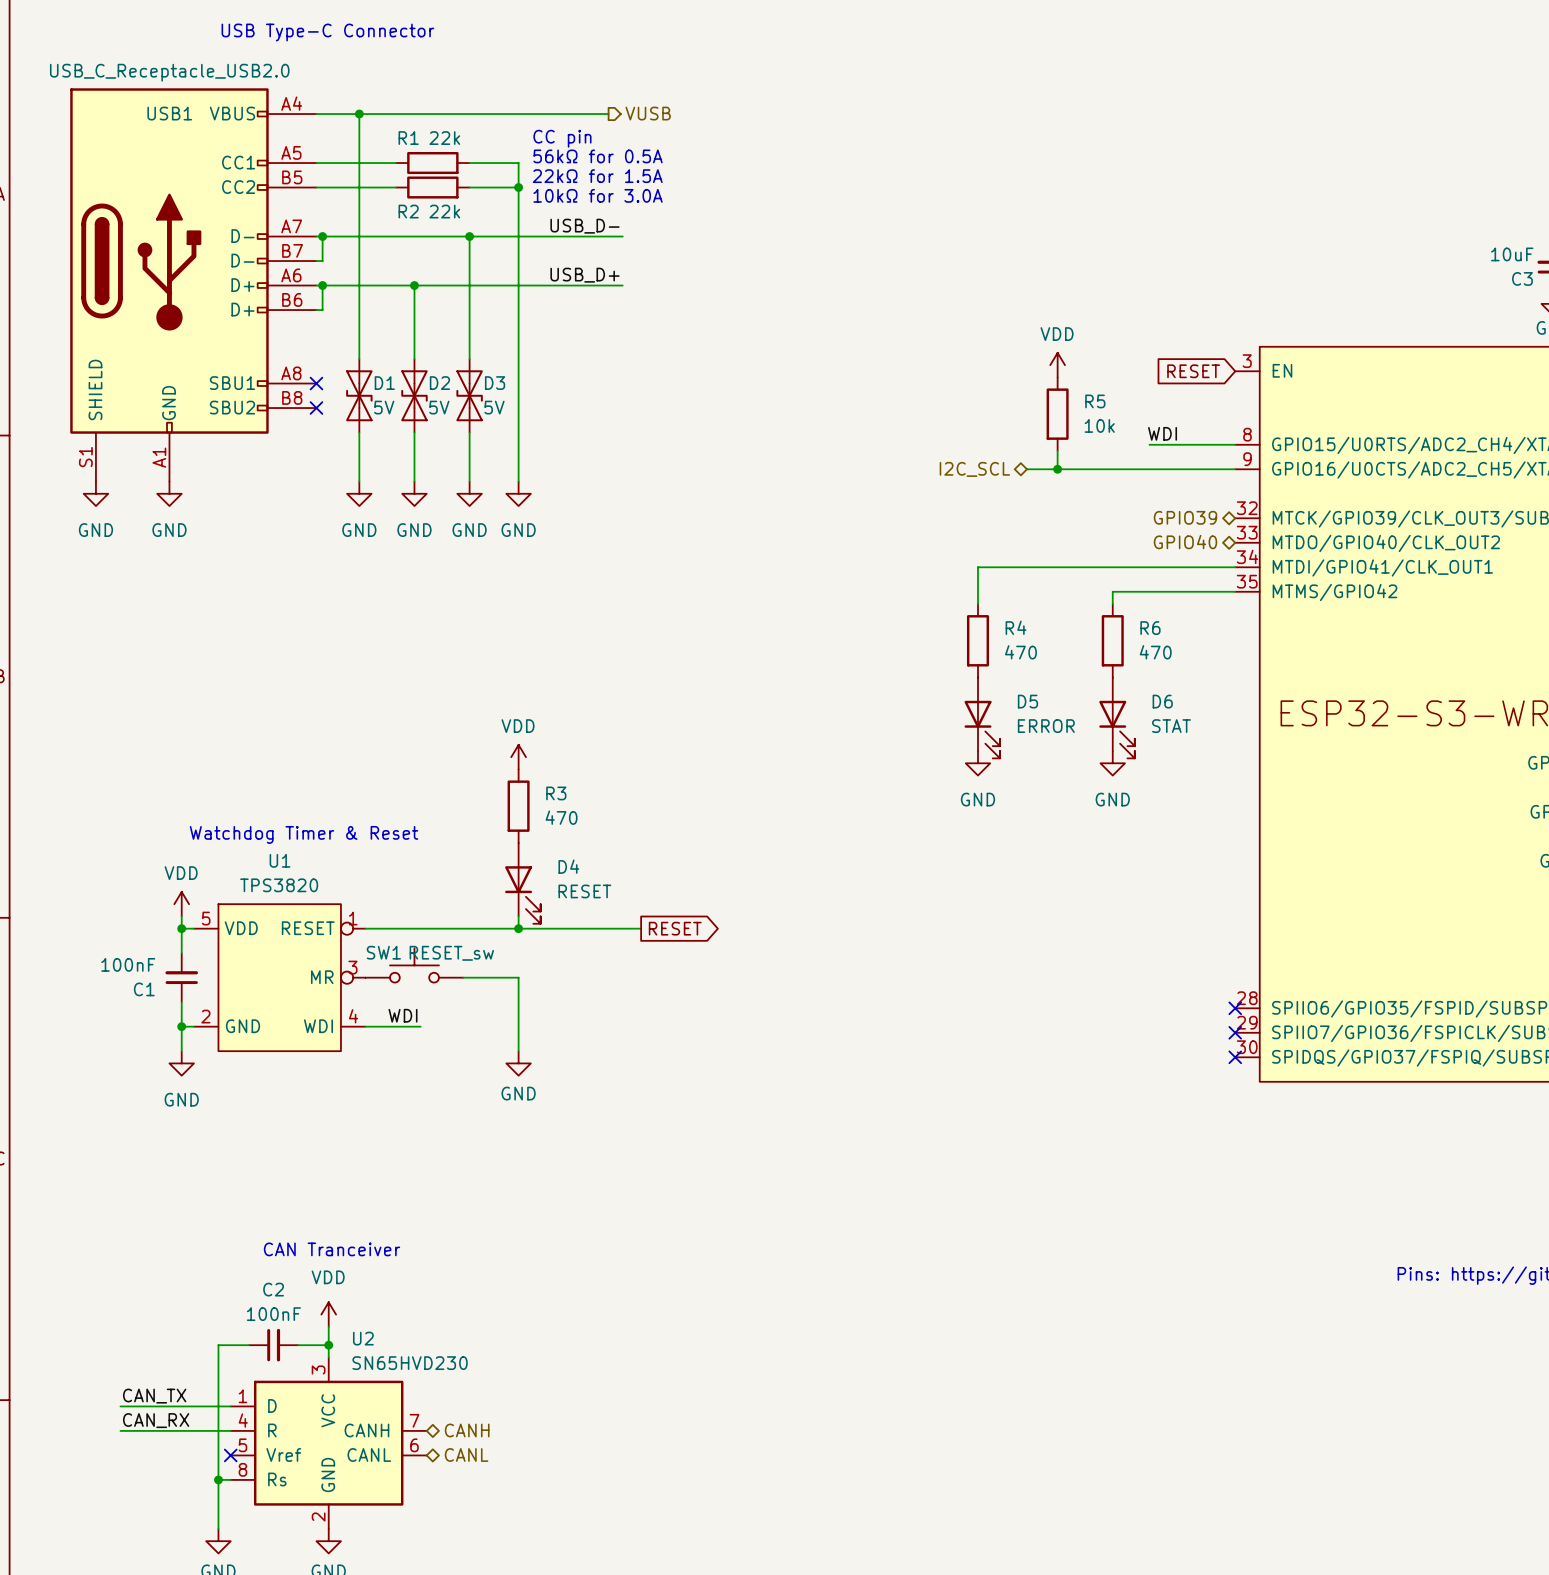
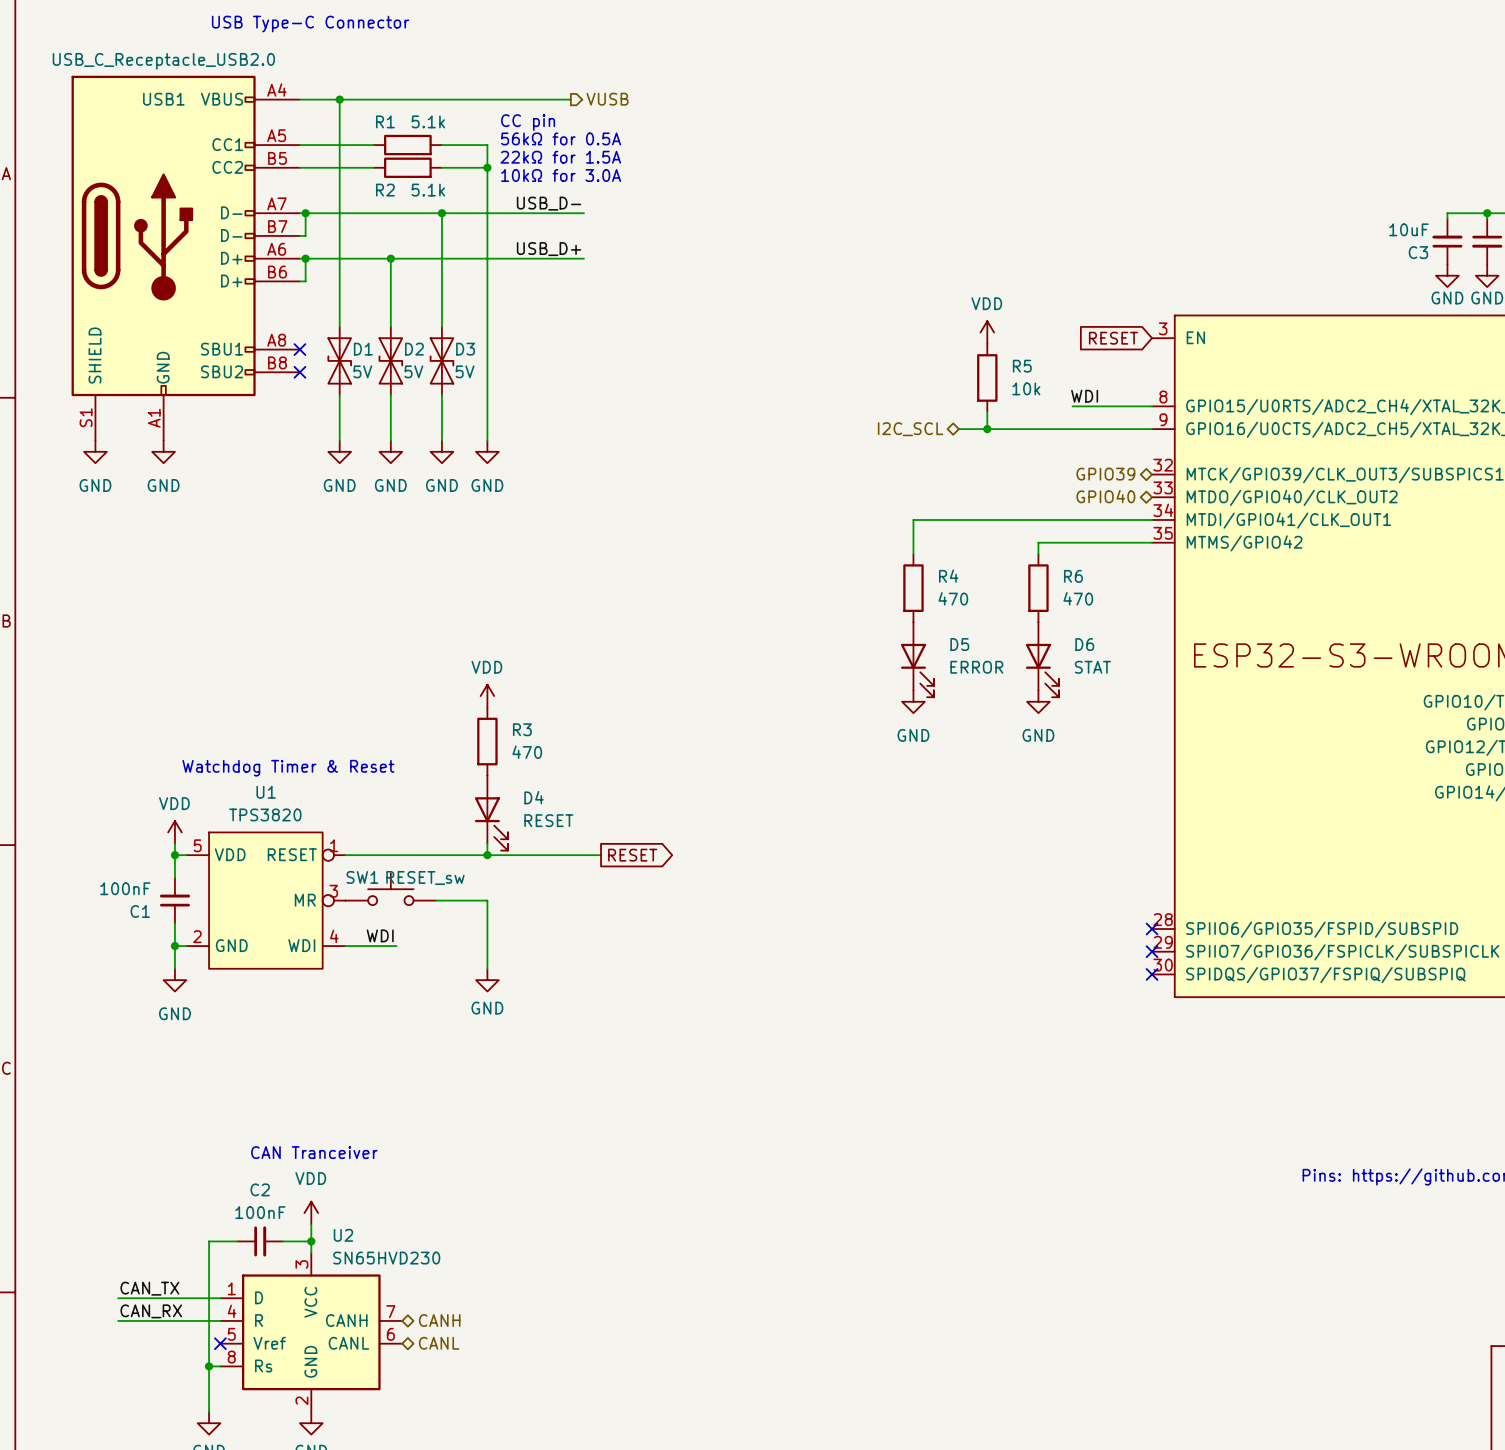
R1 value: 22k (444, 138) -> 5.1k (428, 121)
R2 value: 22k (444, 211) -> 5.1k (428, 190)

